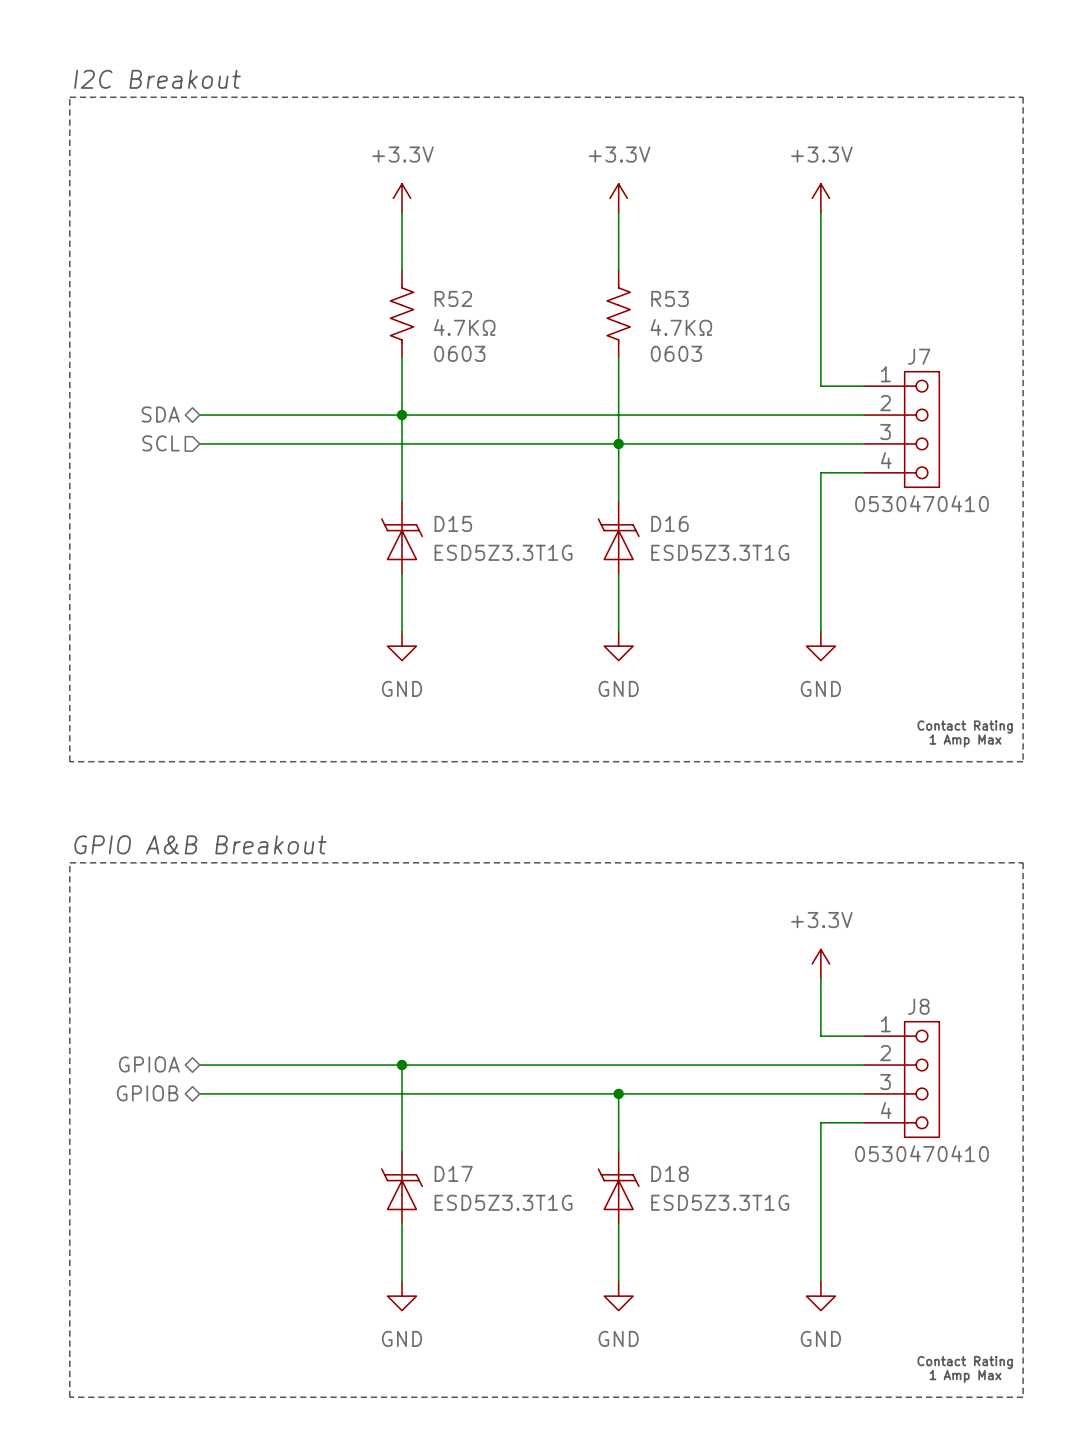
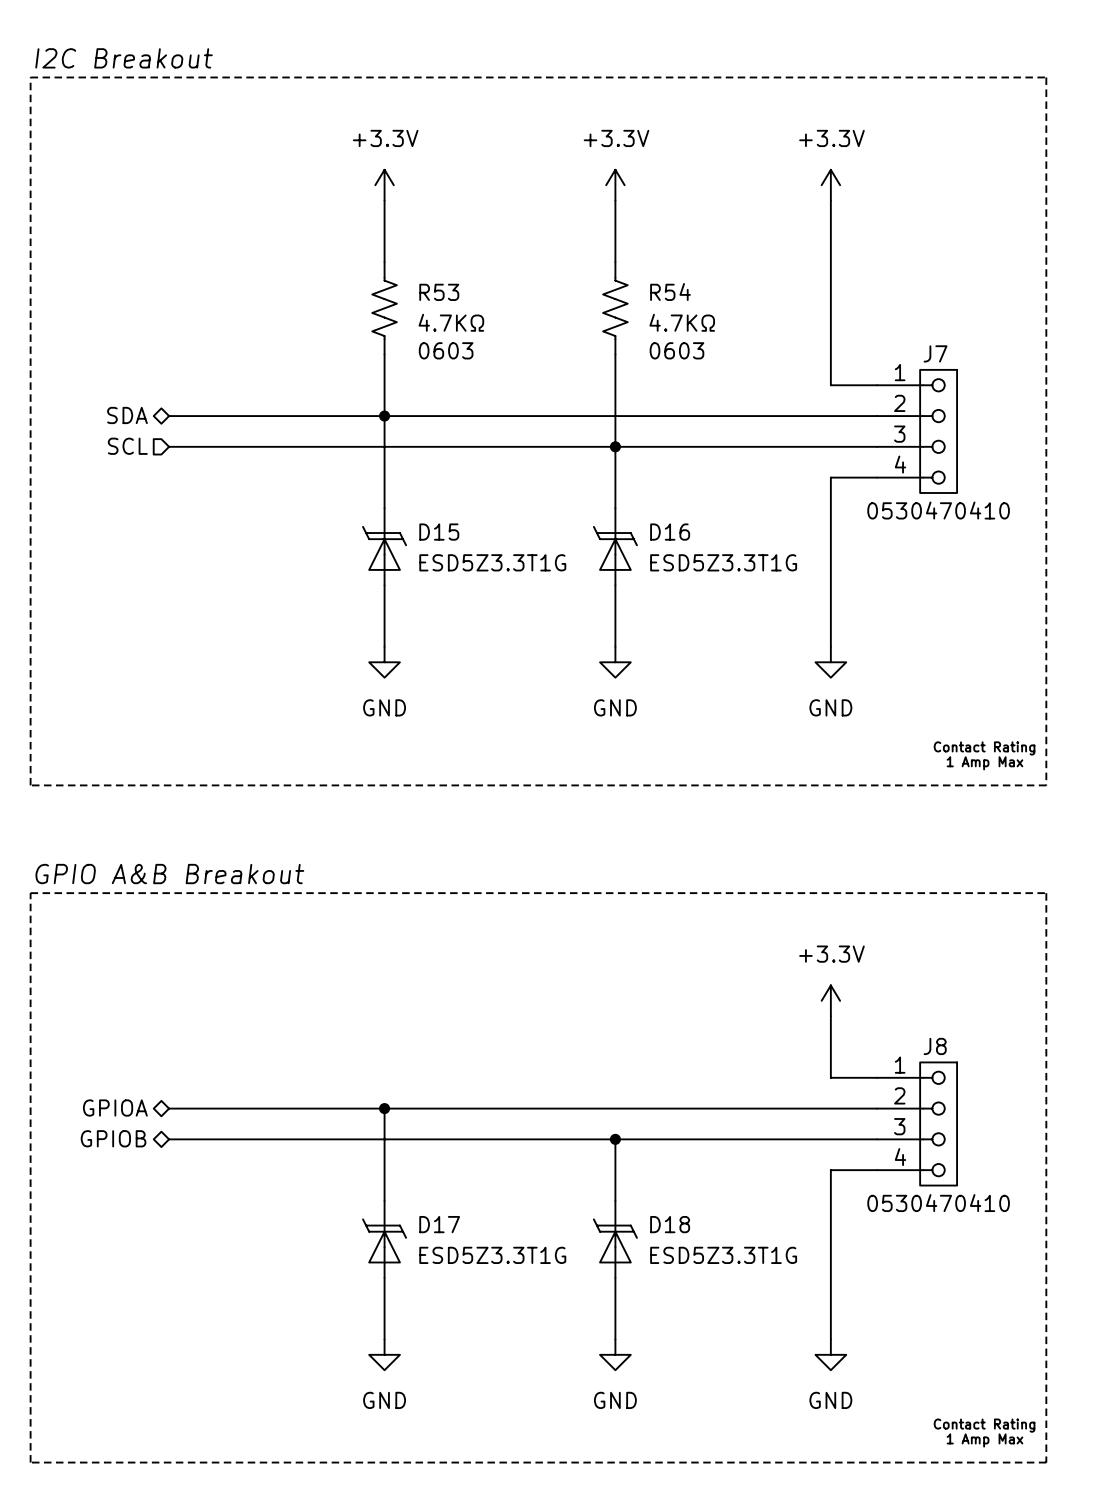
R52 name: R52 (453, 298) -> R53 (439, 292)
R53 name: R53 (670, 298) -> R54 (670, 291)

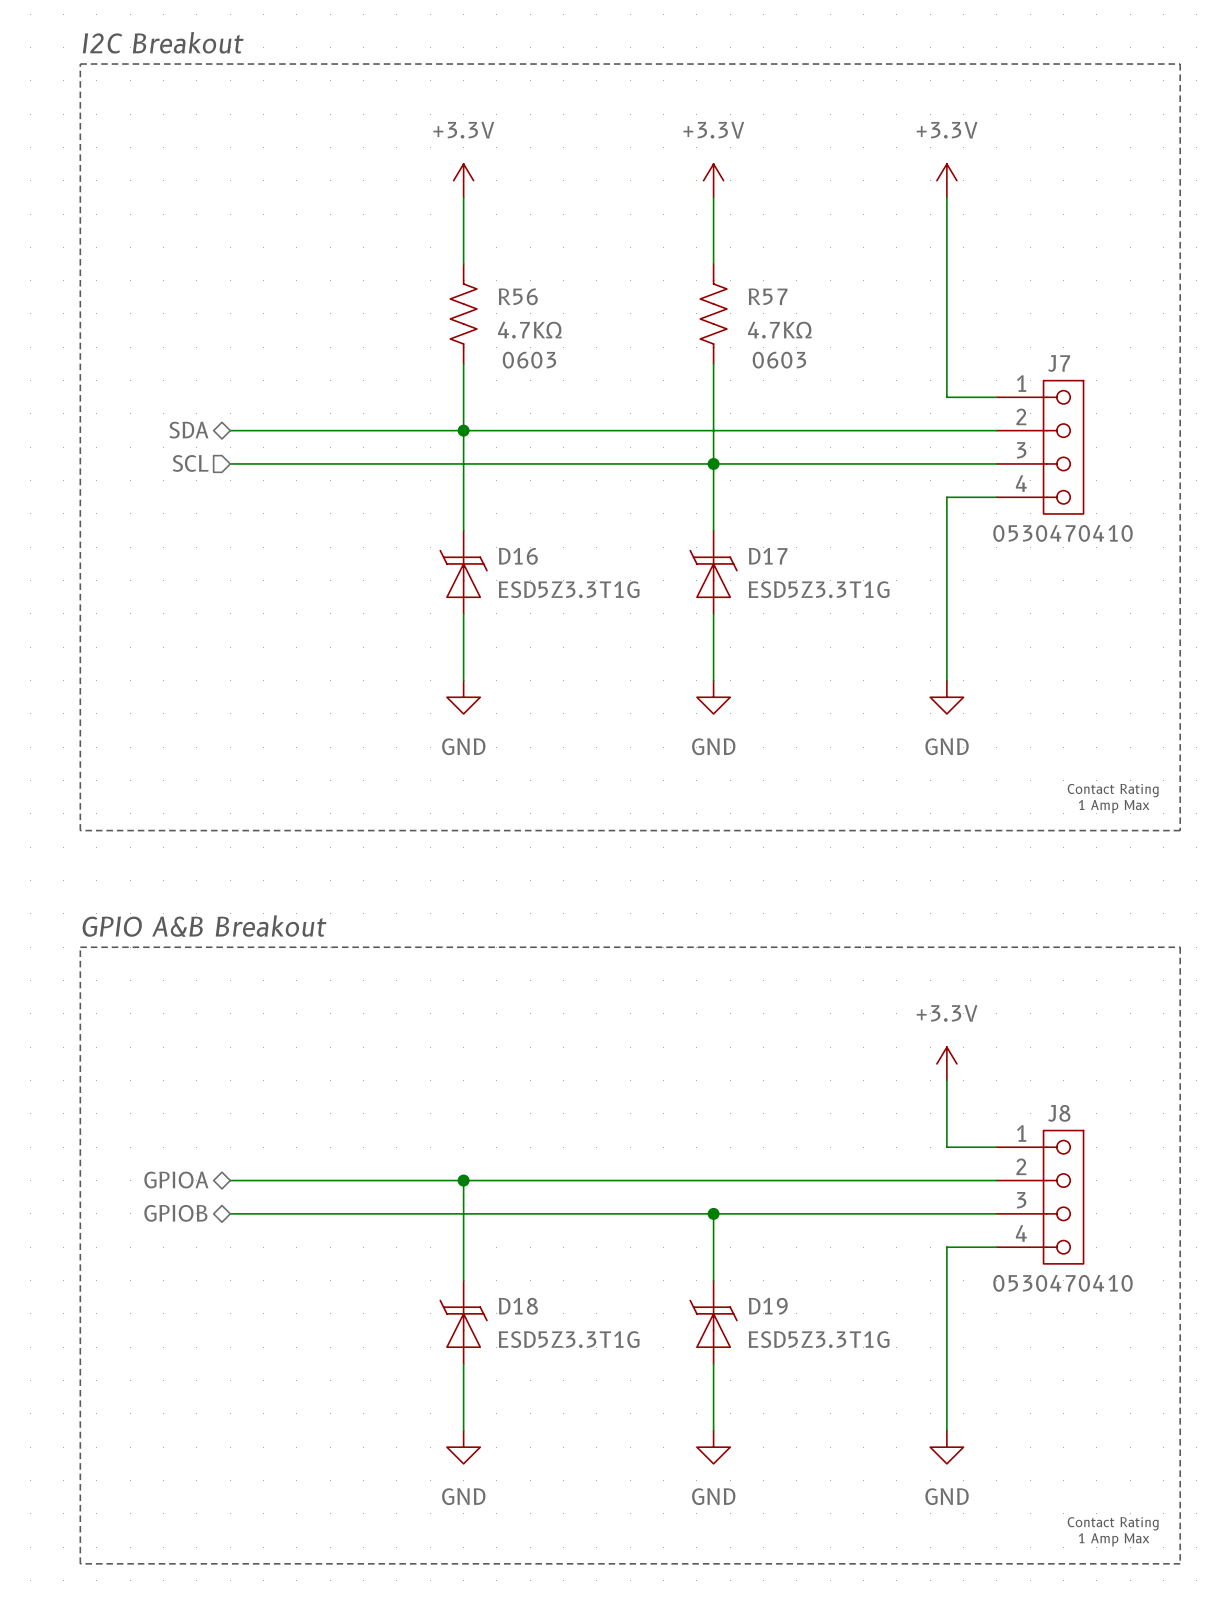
R54 name: R54 (670, 291) -> R57 (768, 296)
R53 name: R53 (439, 292) -> R56 (518, 296)
D15 name: D15 (439, 532) -> D16 (518, 556)
D16 name: D16 (670, 532) -> D17 (768, 556)
D17 name: D17 (439, 1224) -> D18 (518, 1306)
D18 name: D18 (670, 1224) -> D19 (768, 1306)

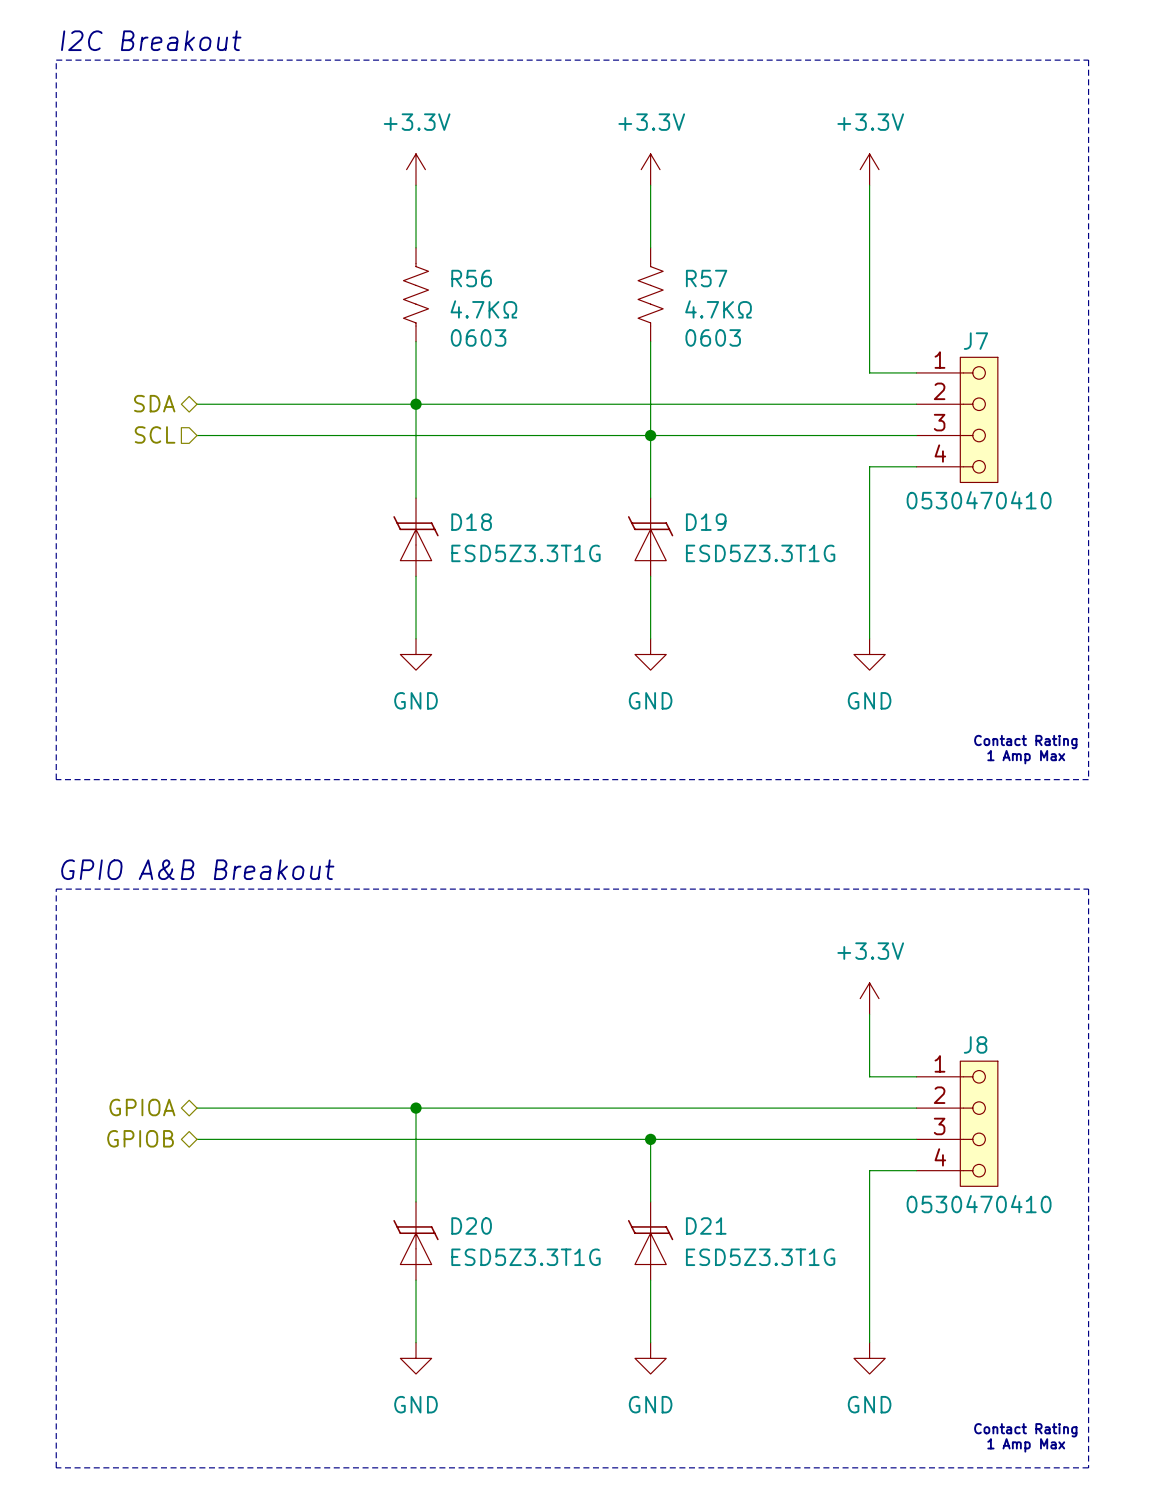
D16 name: D16 (518, 556) -> D18 (471, 522)
D17 name: D17 (768, 556) -> D19 (706, 522)
D18 name: D18 (518, 1306) -> D20 (471, 1225)
D19 name: D19 (768, 1306) -> D21 (706, 1225)

